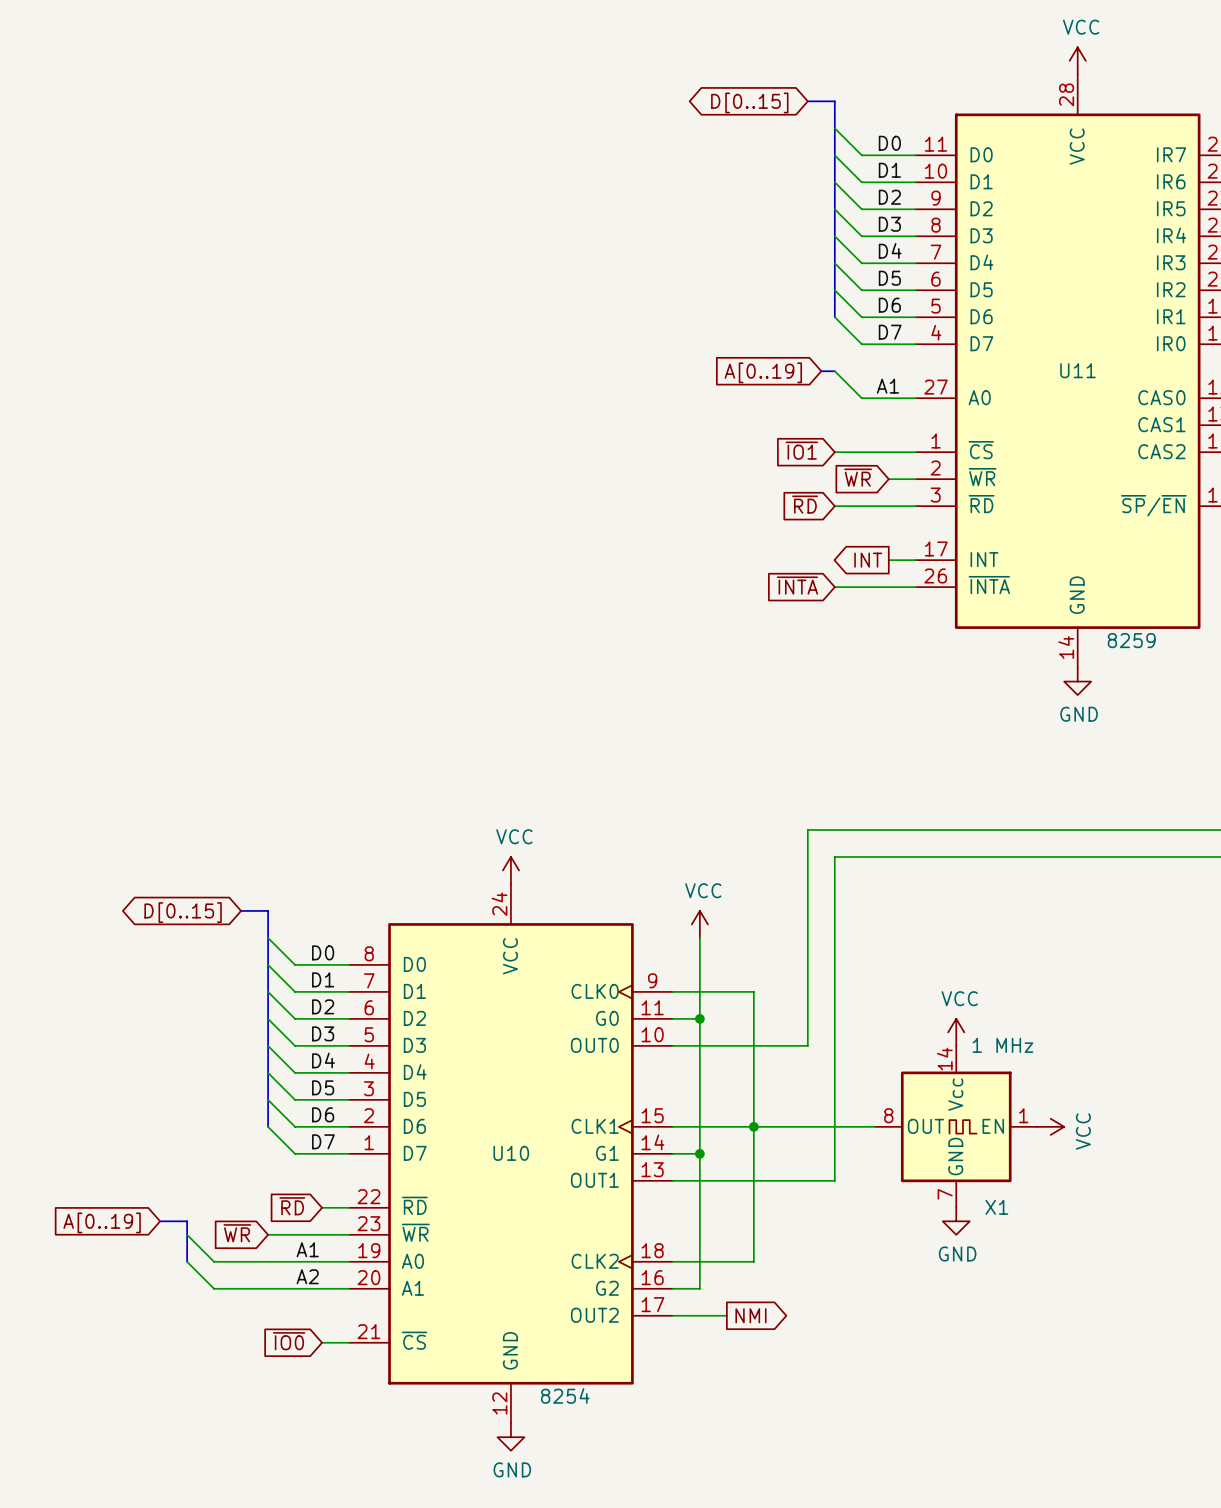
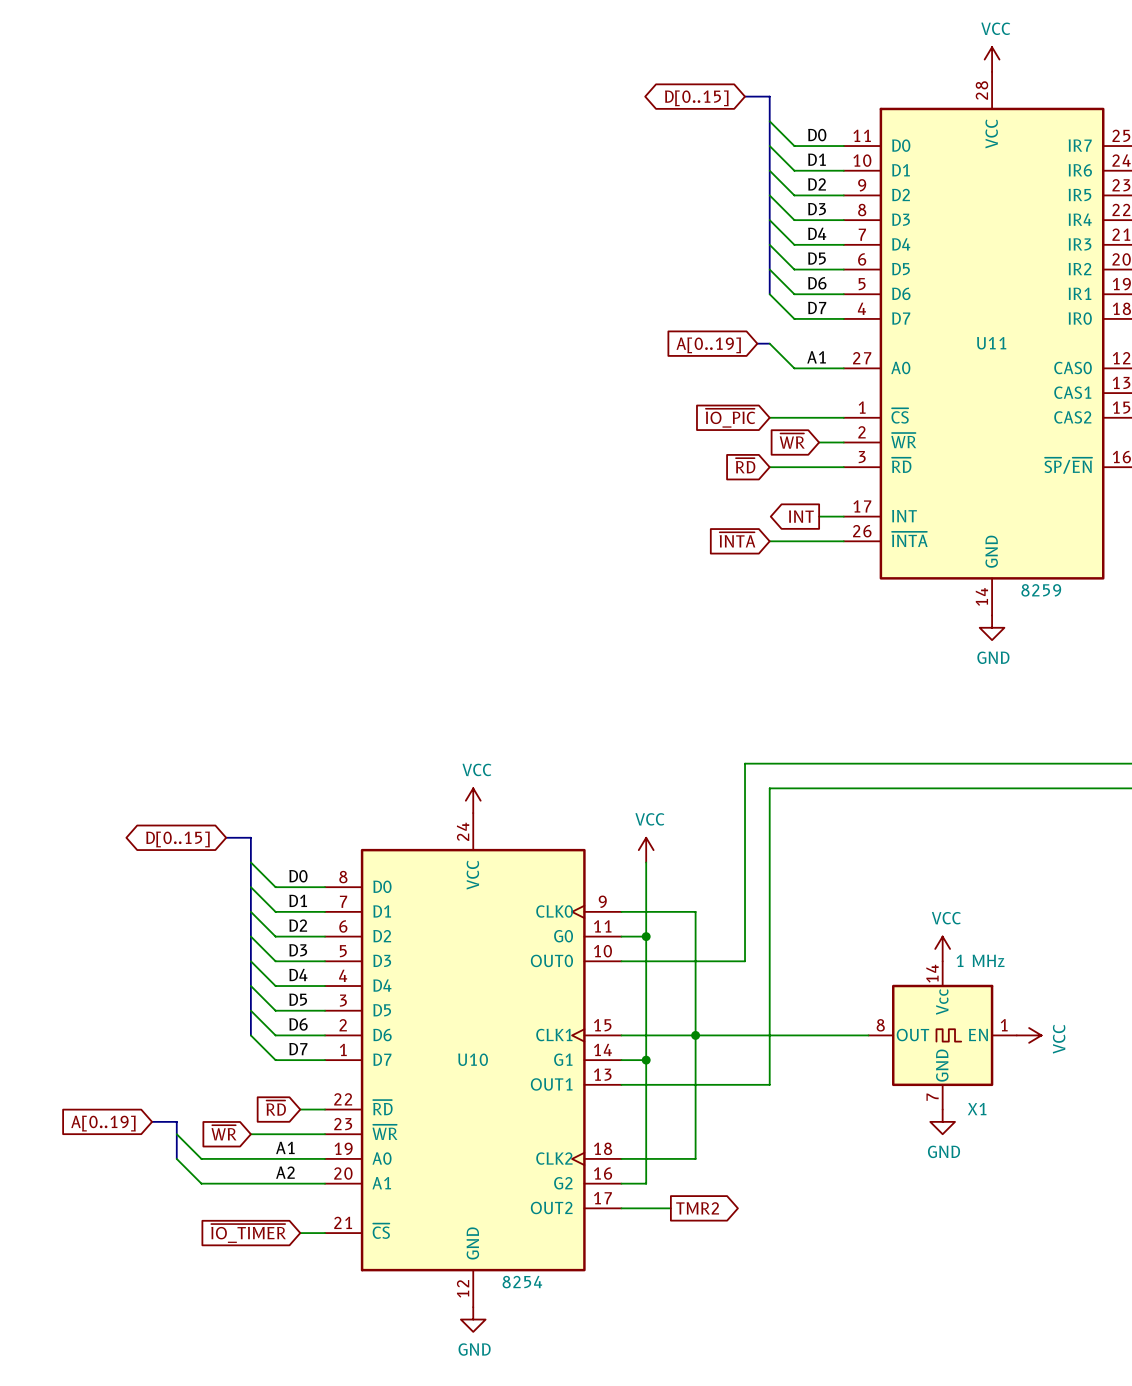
global label: ~{IO1} (801, 450) -> ~{IO_PIC} (730, 418)
power symbol: VCC (956, 1032) -> none
power symbol: none -> VCC (942, 948)
X1 position: (956, 1126) -> (942, 1035)
power symbol: VCC (1050, 1126) -> none
power symbol: none -> VCC (1029, 1035)
power symbol position: GND (956, 1221) -> GND (942, 1121)
global label: NMI (750, 1315) -> TMR2 (697, 1208)
global label: ~{IO0} (289, 1341) -> ~{IO_TIMER} (248, 1233)

